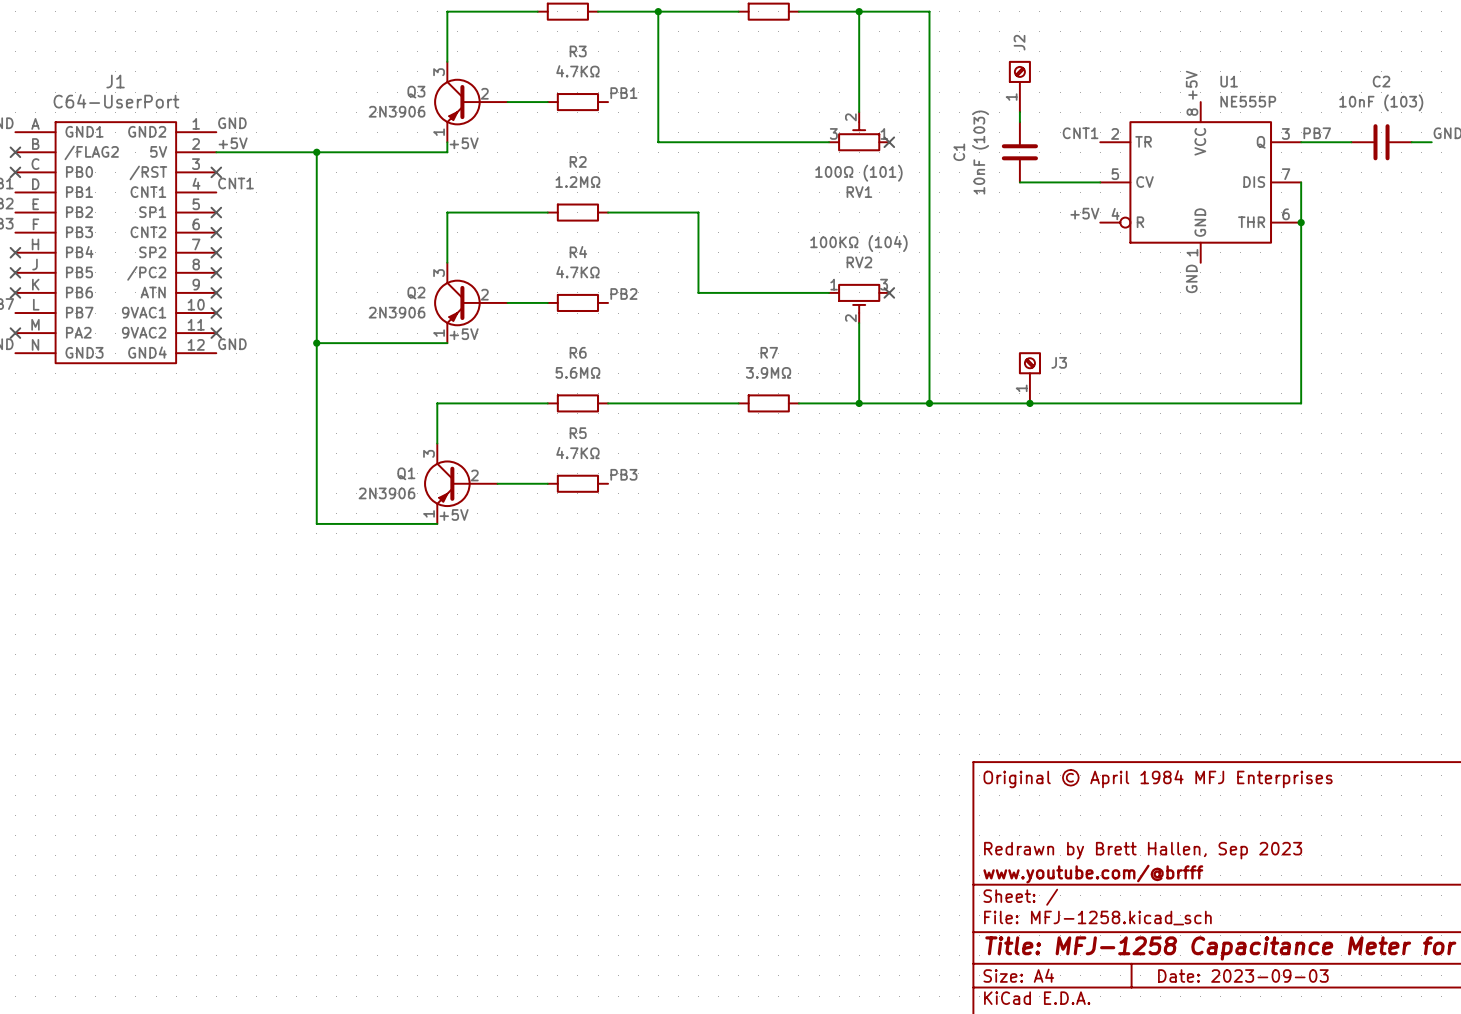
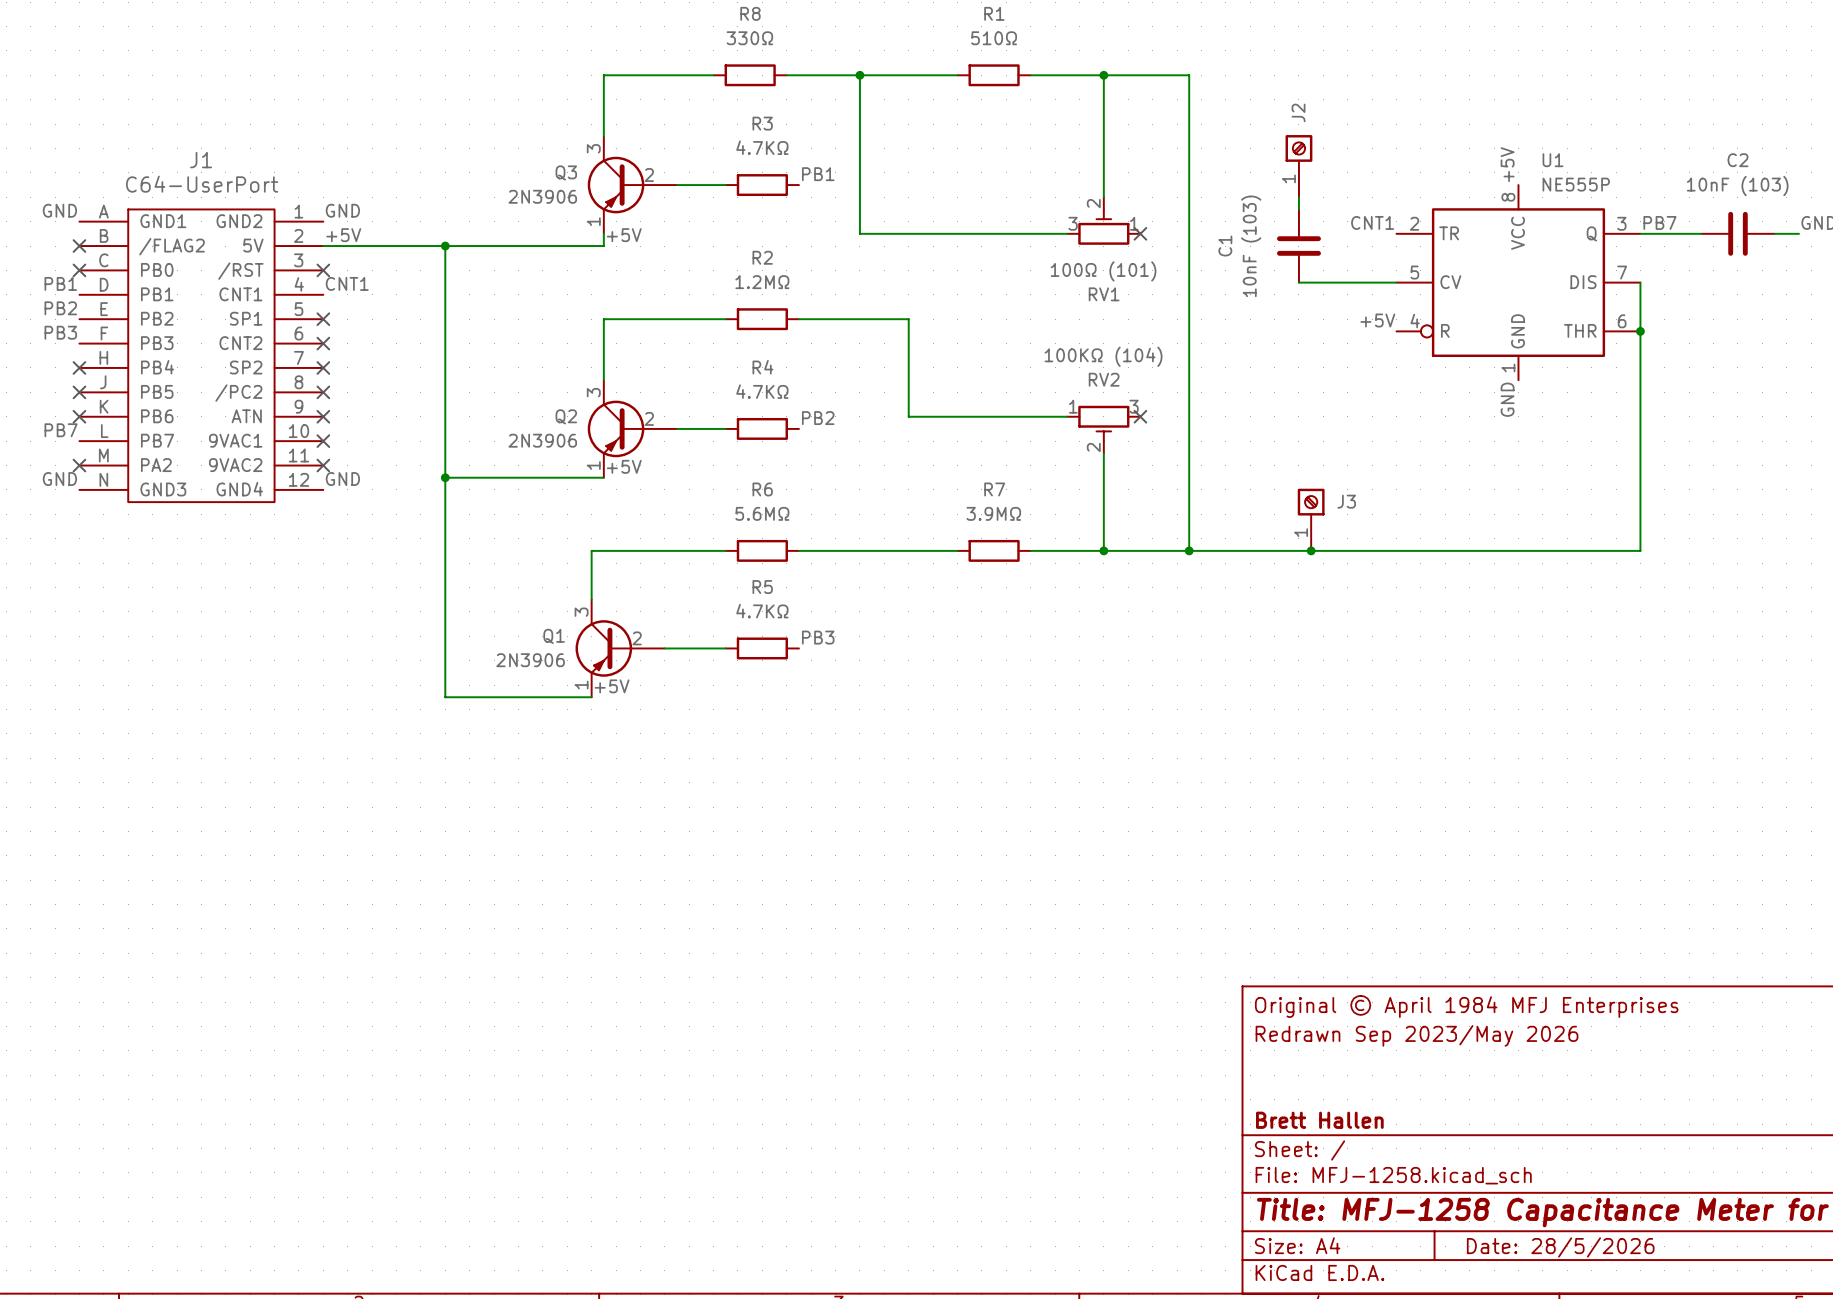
title block: none -> Redrawn Sep 2023/May 2026 (1417, 1035)
title block: Redrawn by Brett Hallen, Sep 2023 (1143, 850) -> none
title block: www.youtube.com/@brfff (1093, 874) -> Brett Hallen (1319, 1120)
title block: Date: 2023-09-03 (1243, 976) -> Date: 28/5/2026 (1560, 1247)

